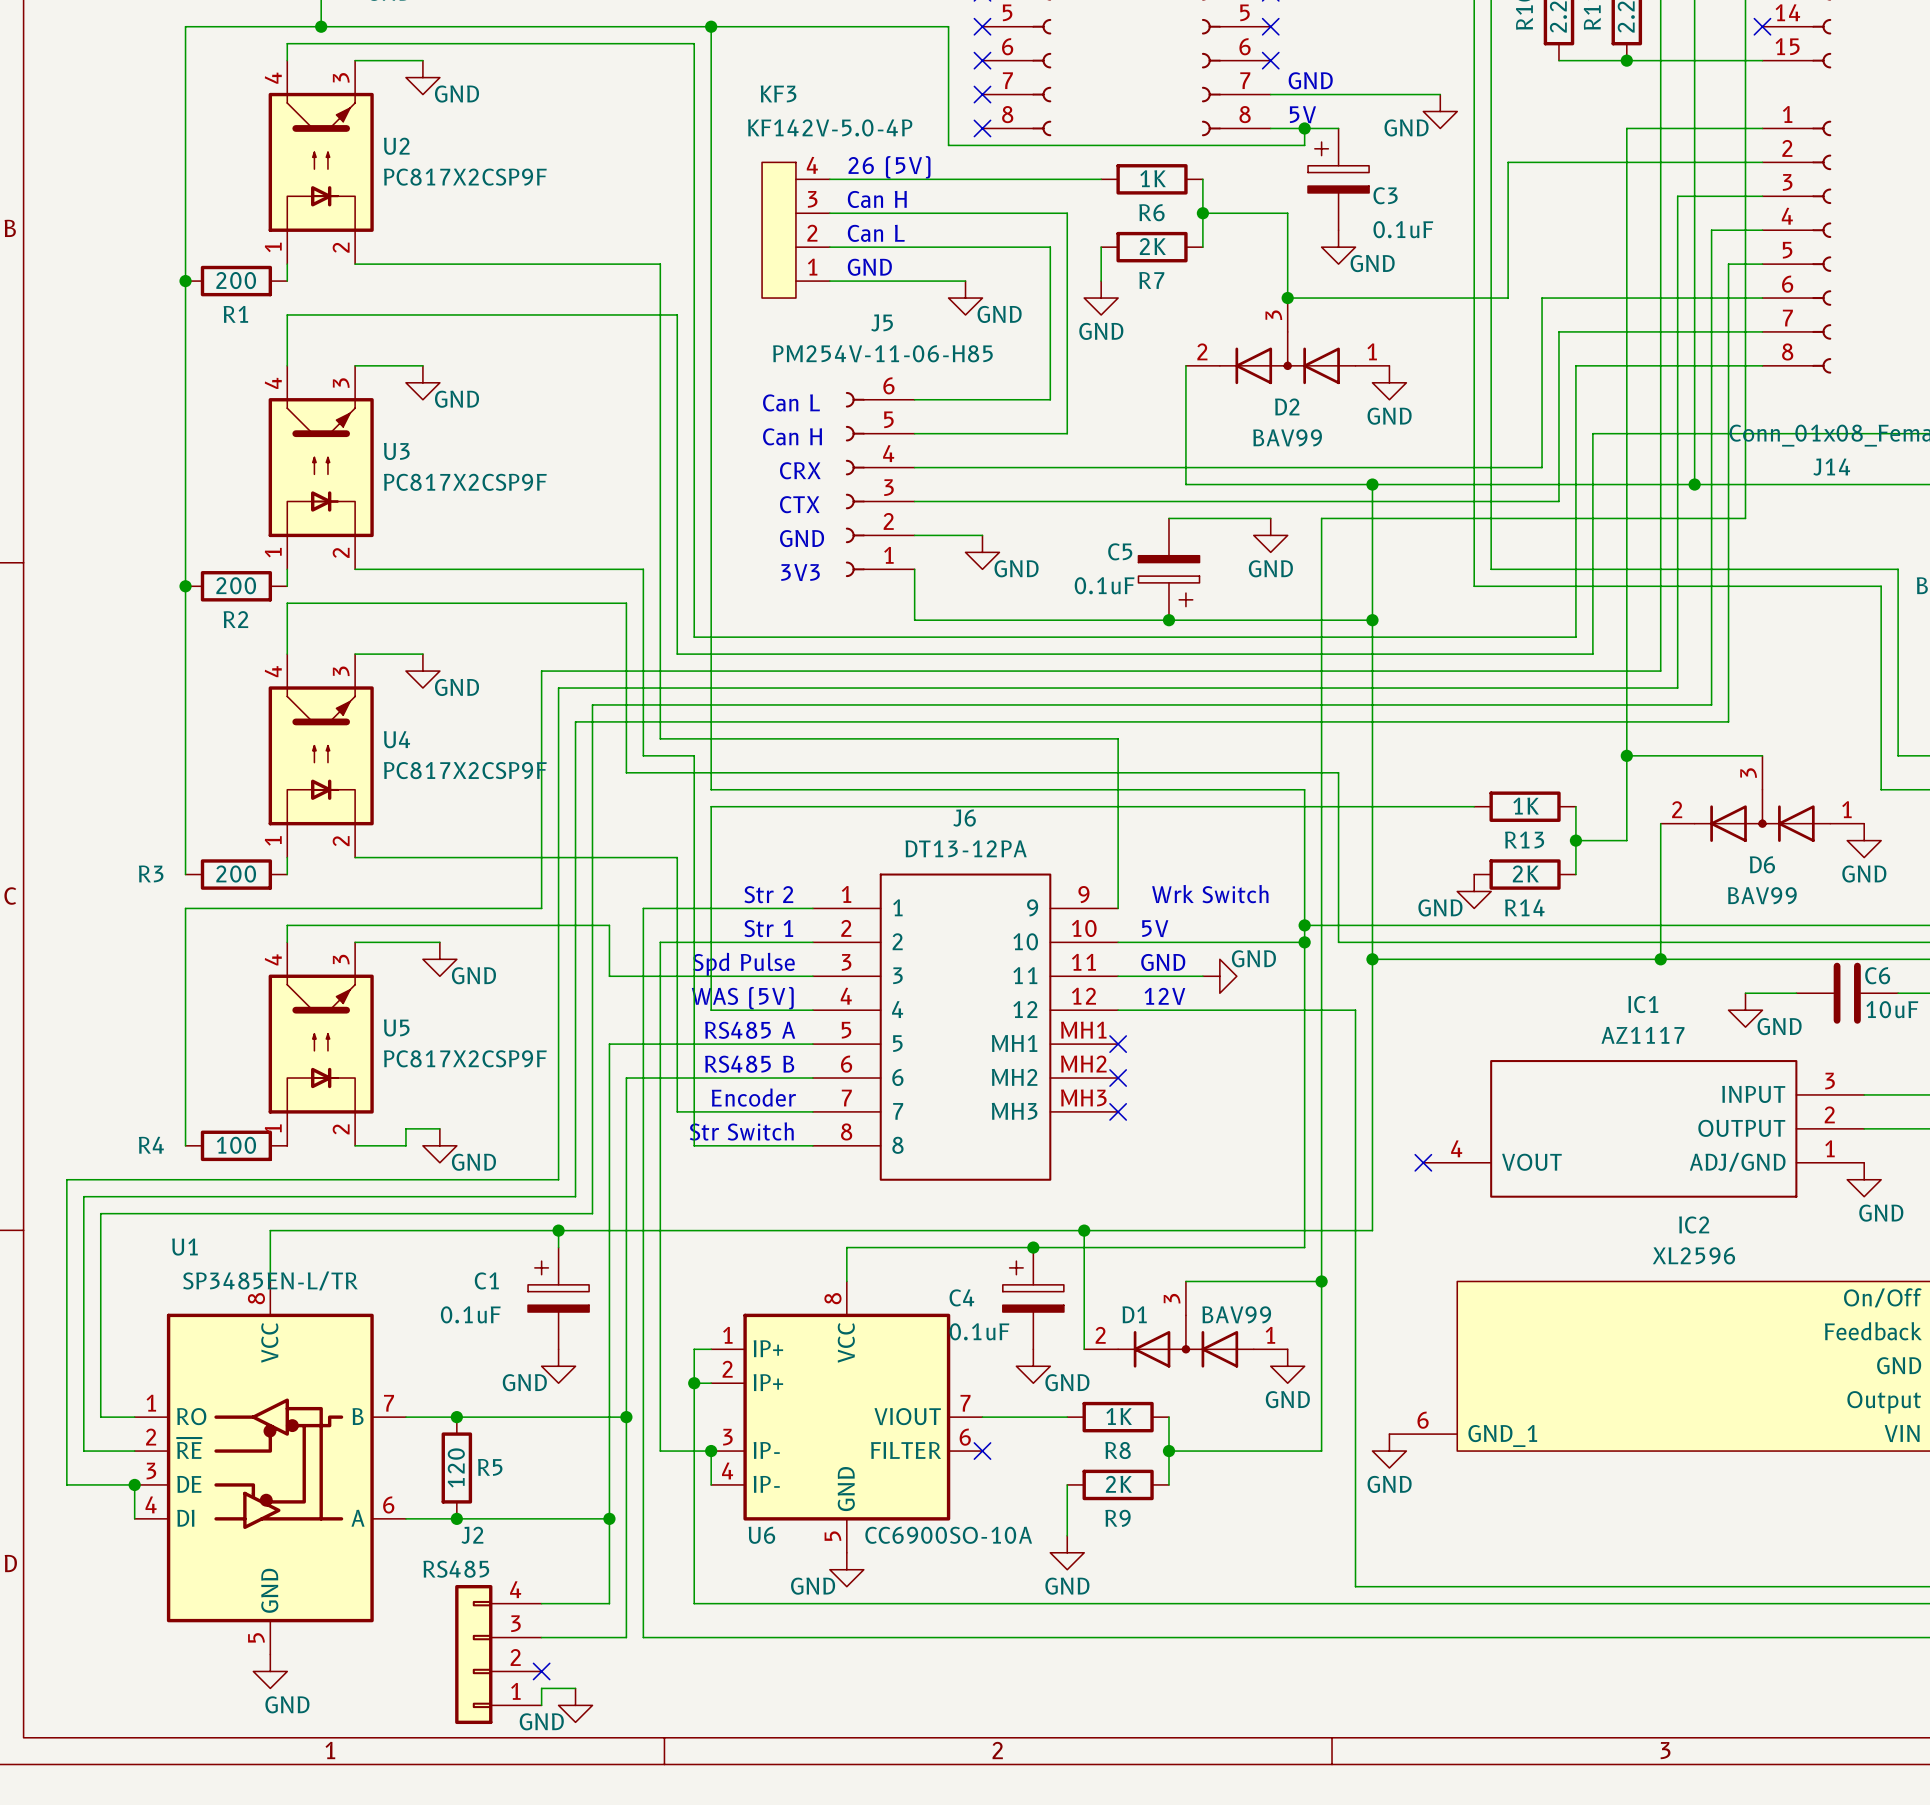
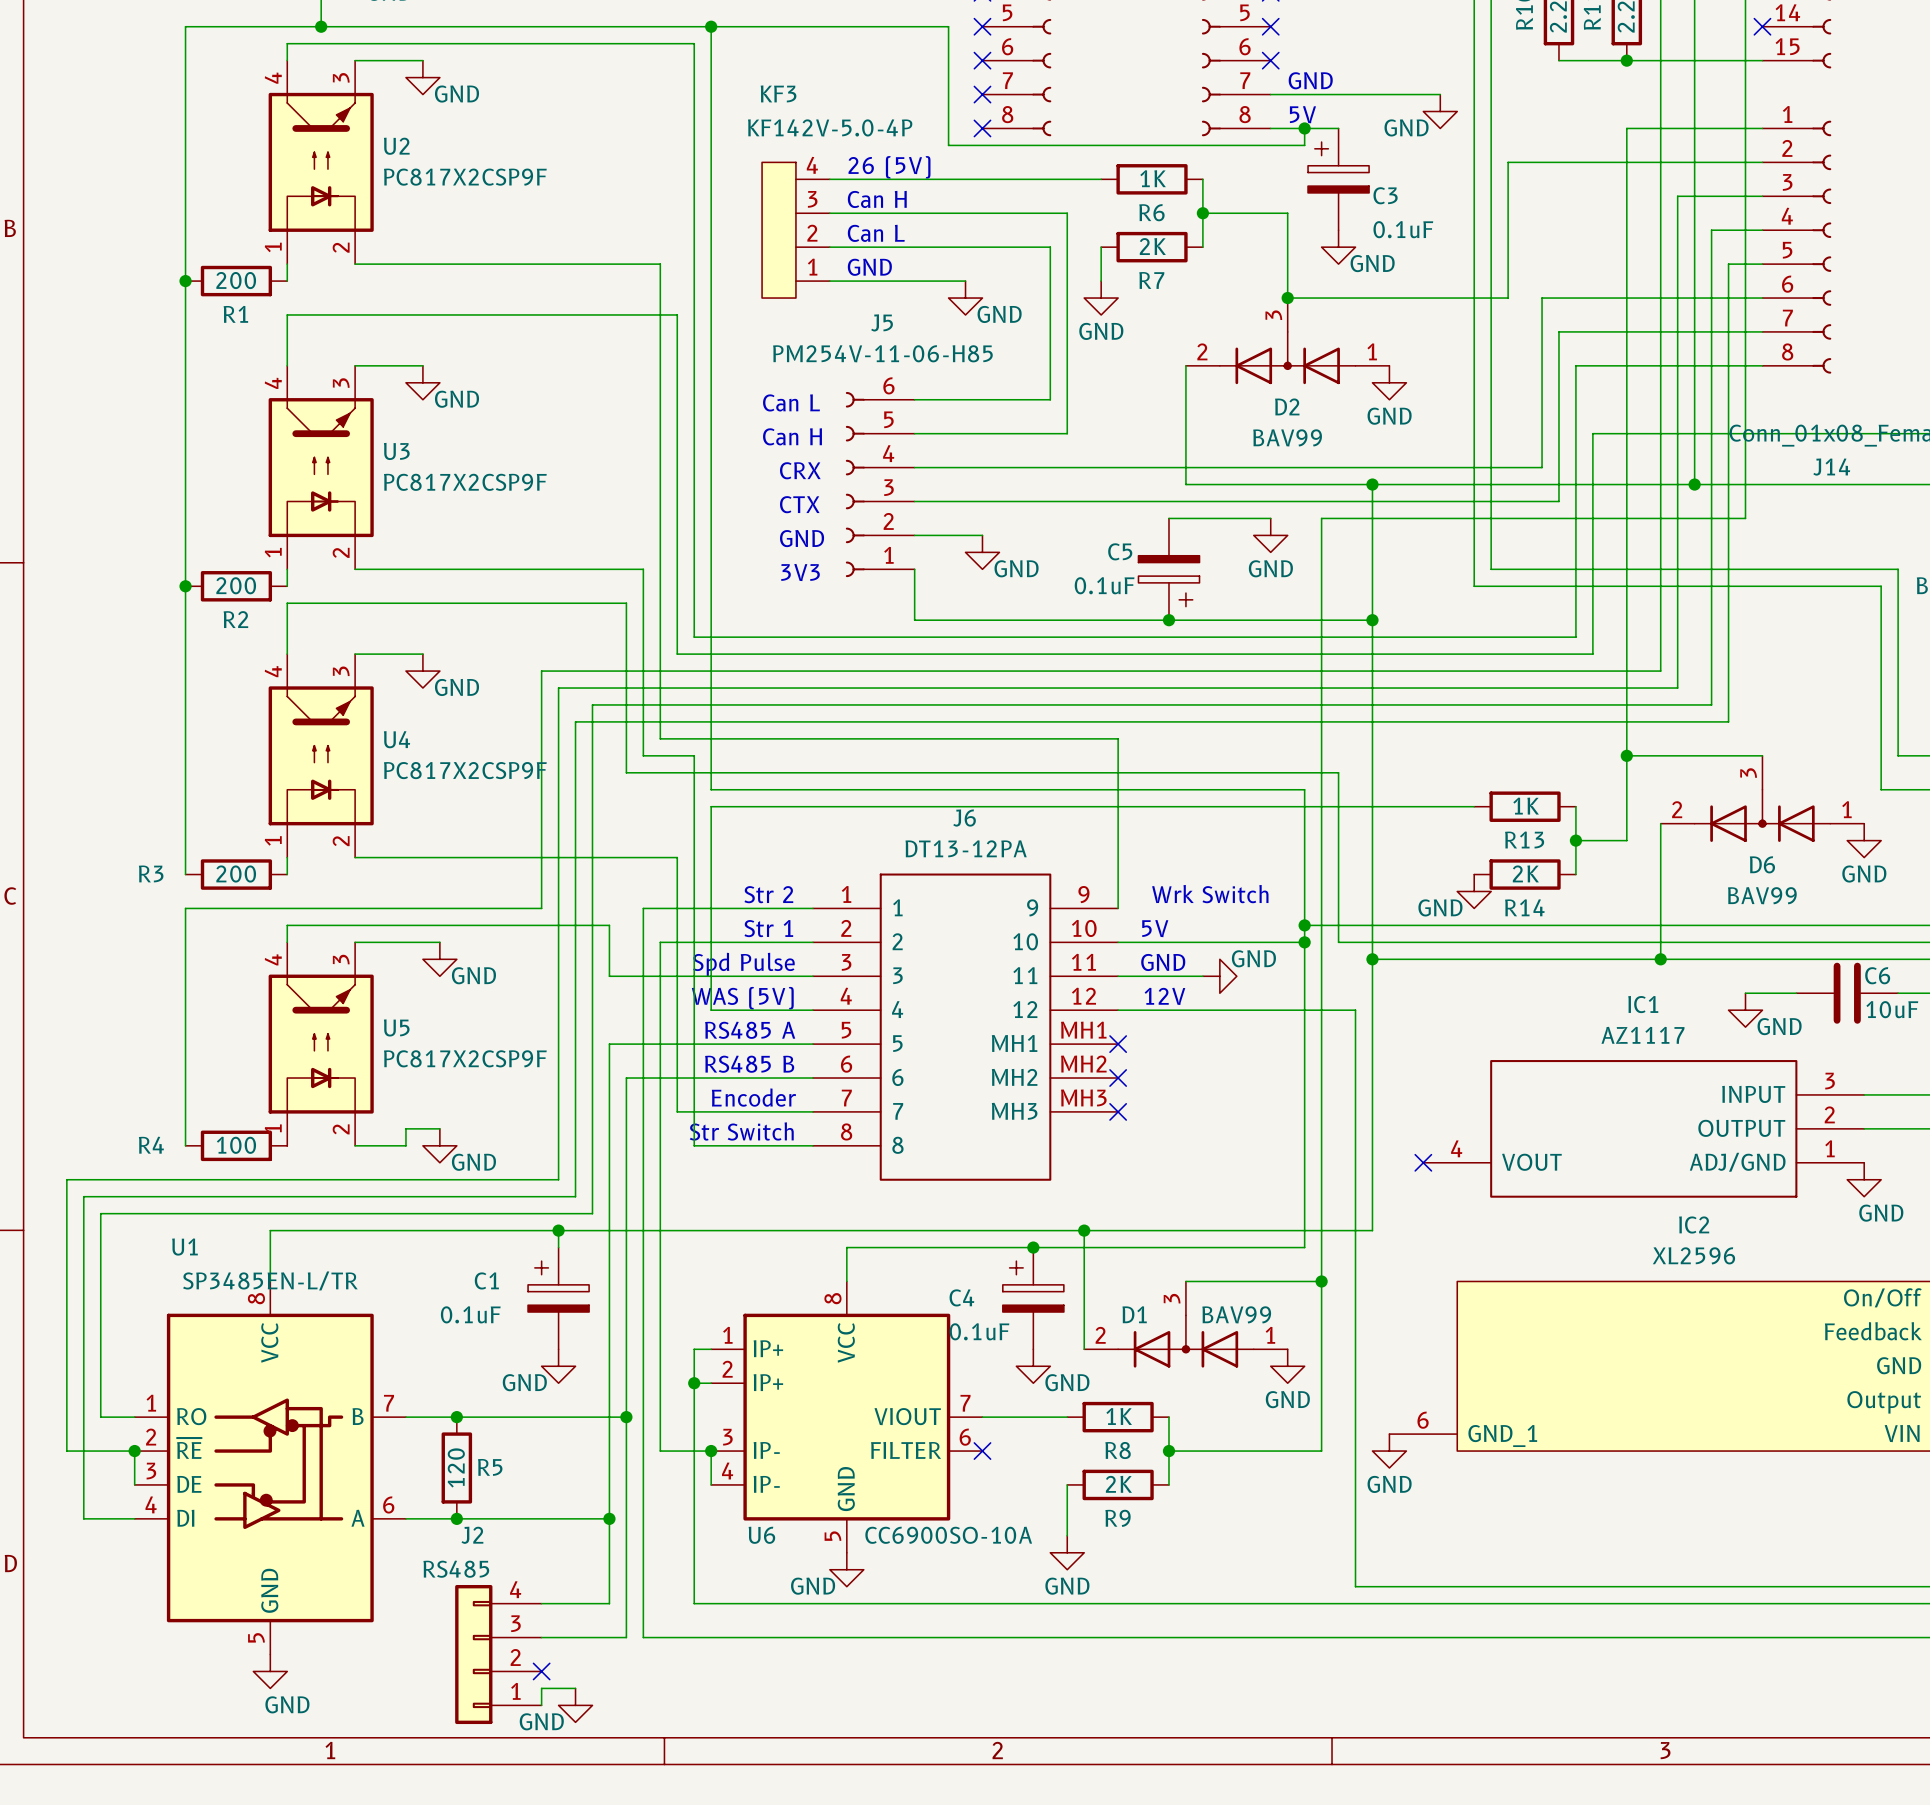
wire: (66, 1451) (66, 1484) (134, 1484) (134, 1518) -> (66, 1451) (83, 1451) (83, 1518) (134, 1518)
wire: none -> (134, 1451) (134, 1484)
junction position: (134, 1484) -> (134, 1451)

